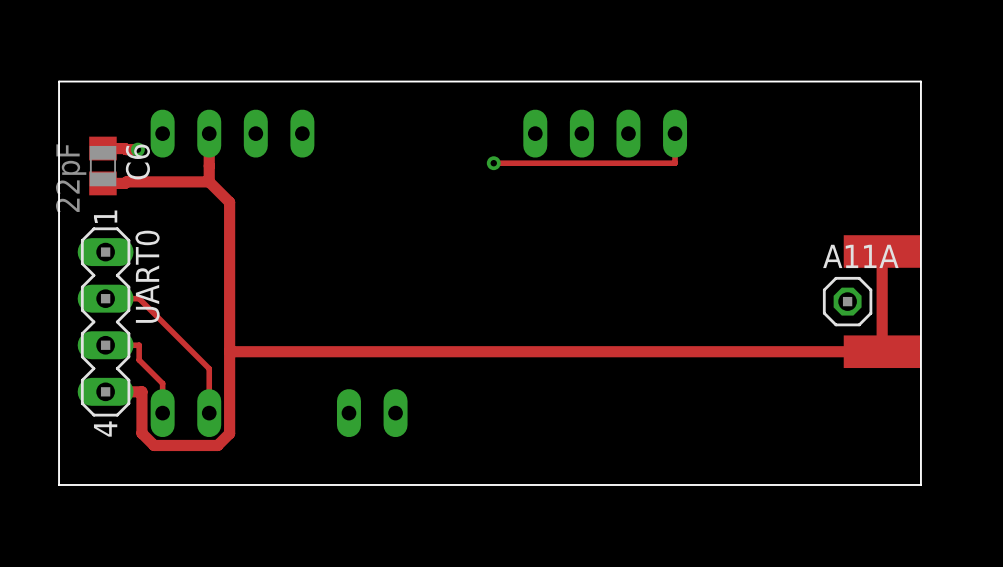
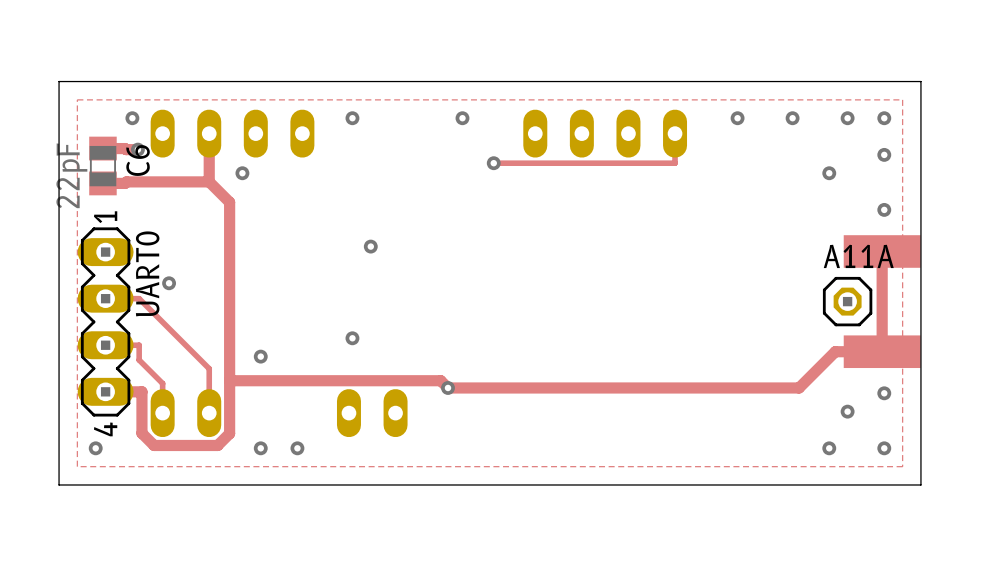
zone outline: none -> (77, 99) (902, 99) (902, 466) (77, 466) (77, 99)
via: none -> (132, 118)
via: none -> (352, 118)
via: none -> (462, 118)
via: none -> (737, 118)
via: none -> (792, 118)
via: none -> (847, 118)
via: none -> (884, 118)
via: none -> (884, 154)
via: none -> (242, 173)
via: none -> (829, 173)
via: none -> (884, 209)
via: none -> (370, 246)
via: none -> (169, 283)
via: none -> (352, 338)
track: (229, 351) (835, 351) -> (229, 380) (440, 380) (448, 387) (799, 387) (835, 351)
via: none -> (260, 356)
via: none -> (448, 387)
via: none -> (884, 393)
via: none -> (847, 411)
via: none -> (95, 448)
via: none -> (260, 448)
via: none -> (297, 448)
via: none -> (829, 448)
via: none -> (884, 448)

